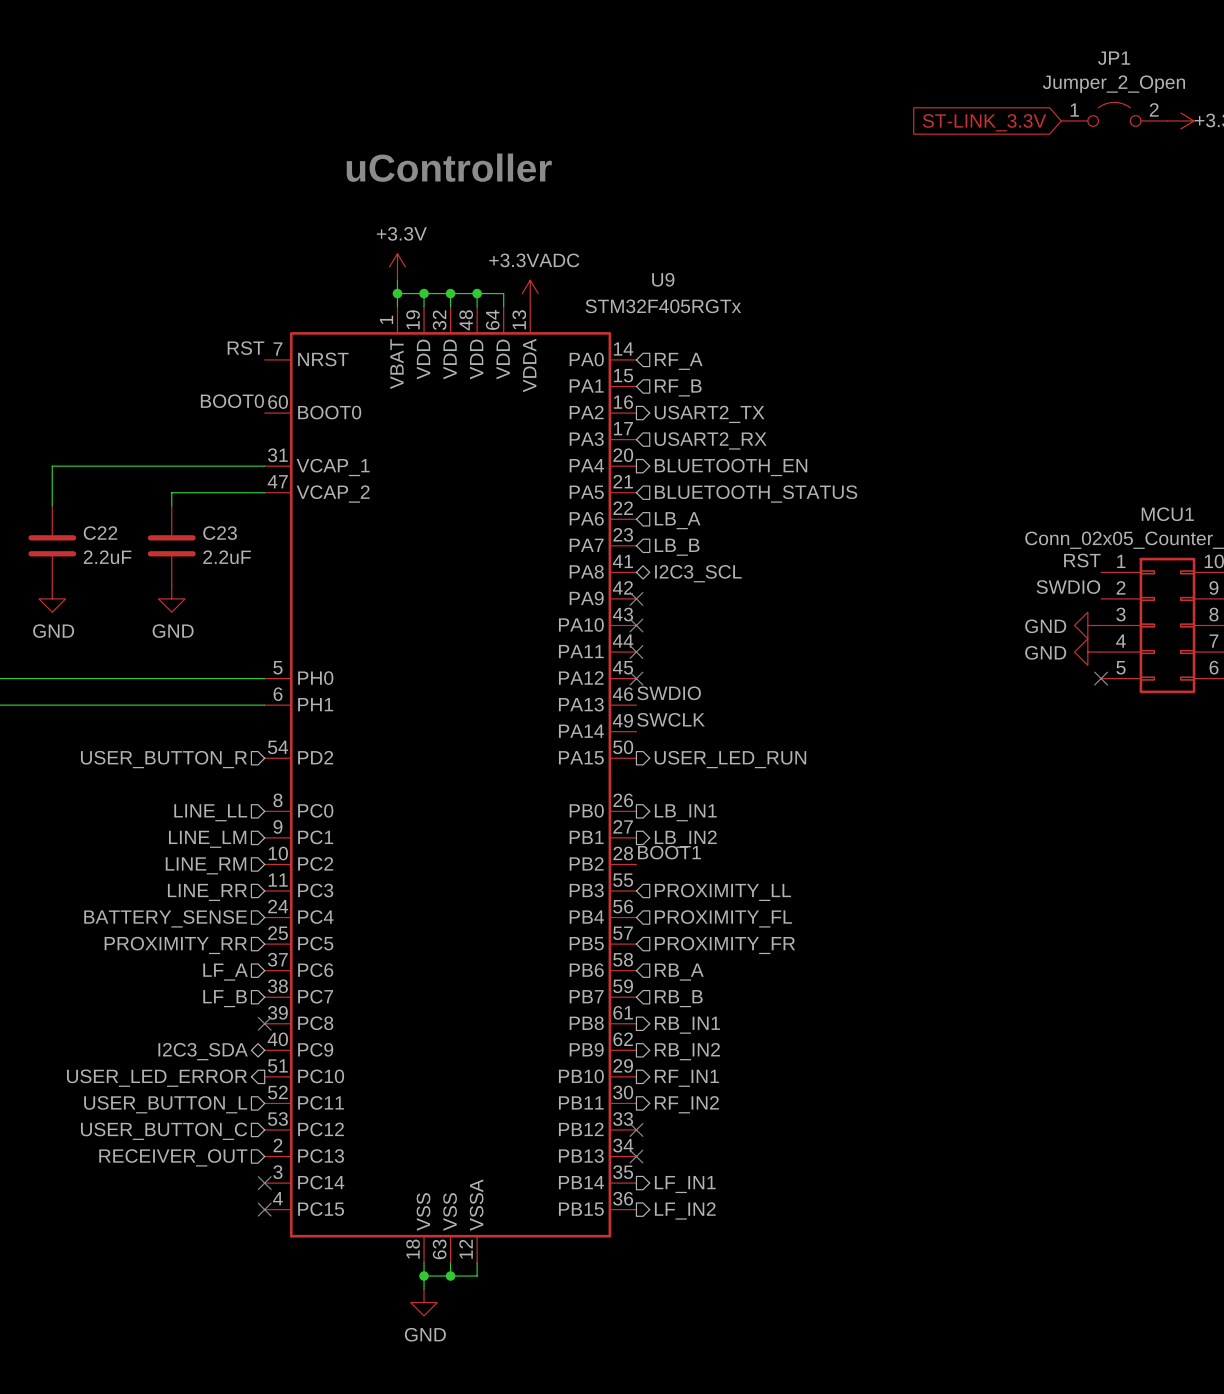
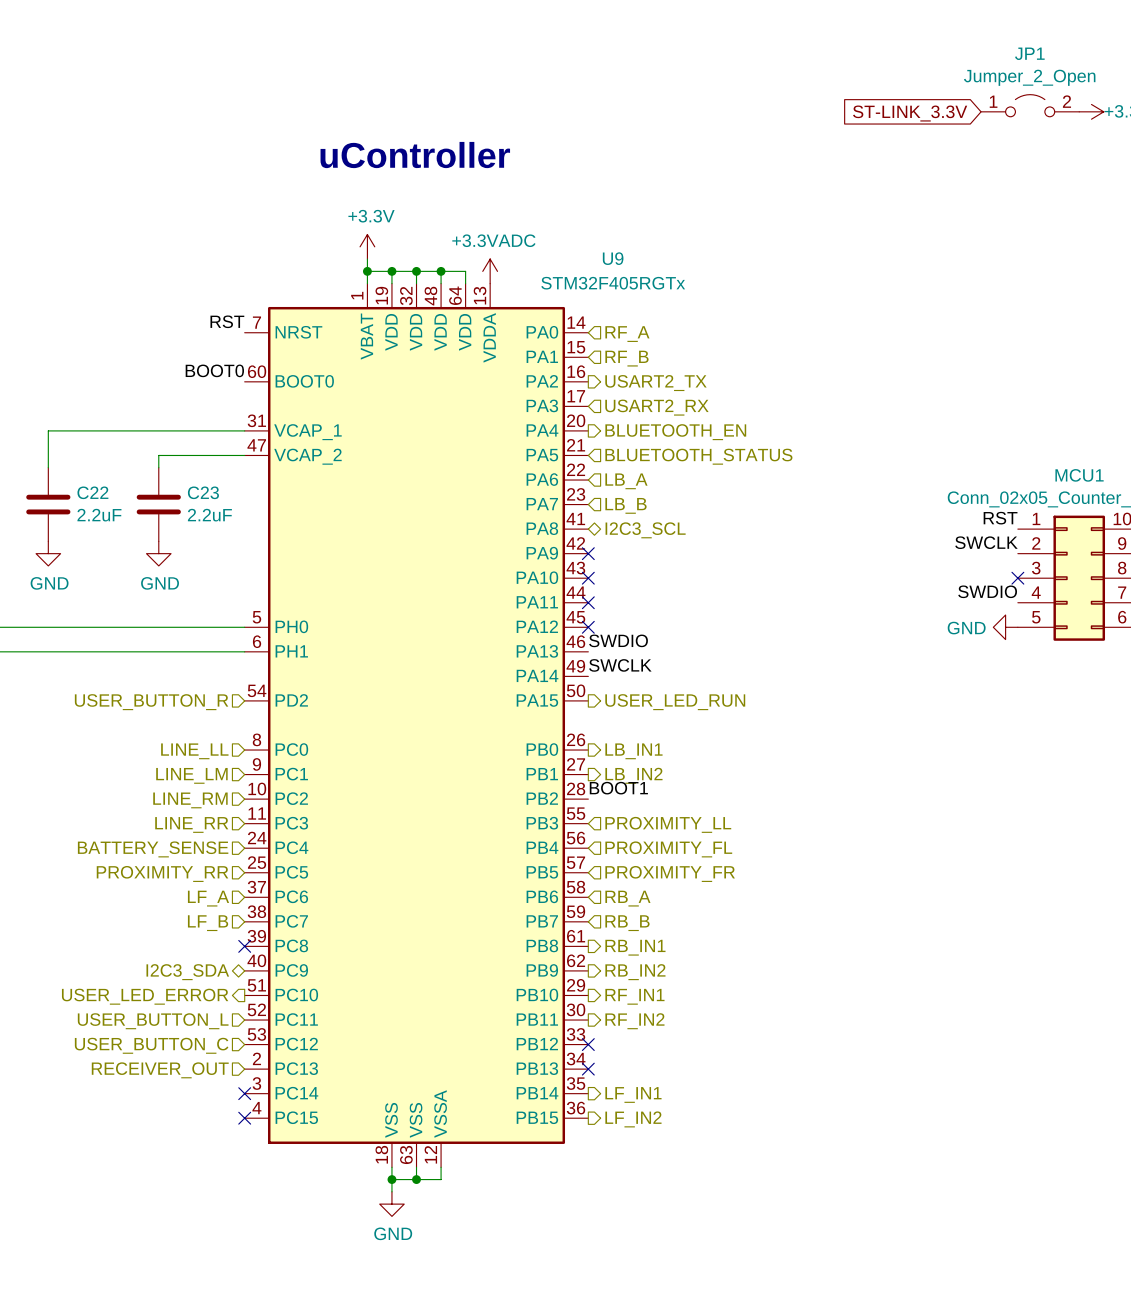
label: SWDIO (1068, 587) -> SWCLK (986, 542)
power symbol: GND (1087, 625) -> none
label: none -> SWDIO (987, 591)
power symbol: GND (1087, 652) -> none
power symbol: none -> GND (1005, 627)
no-connect mark position: (1101, 678) -> (1017, 578)

